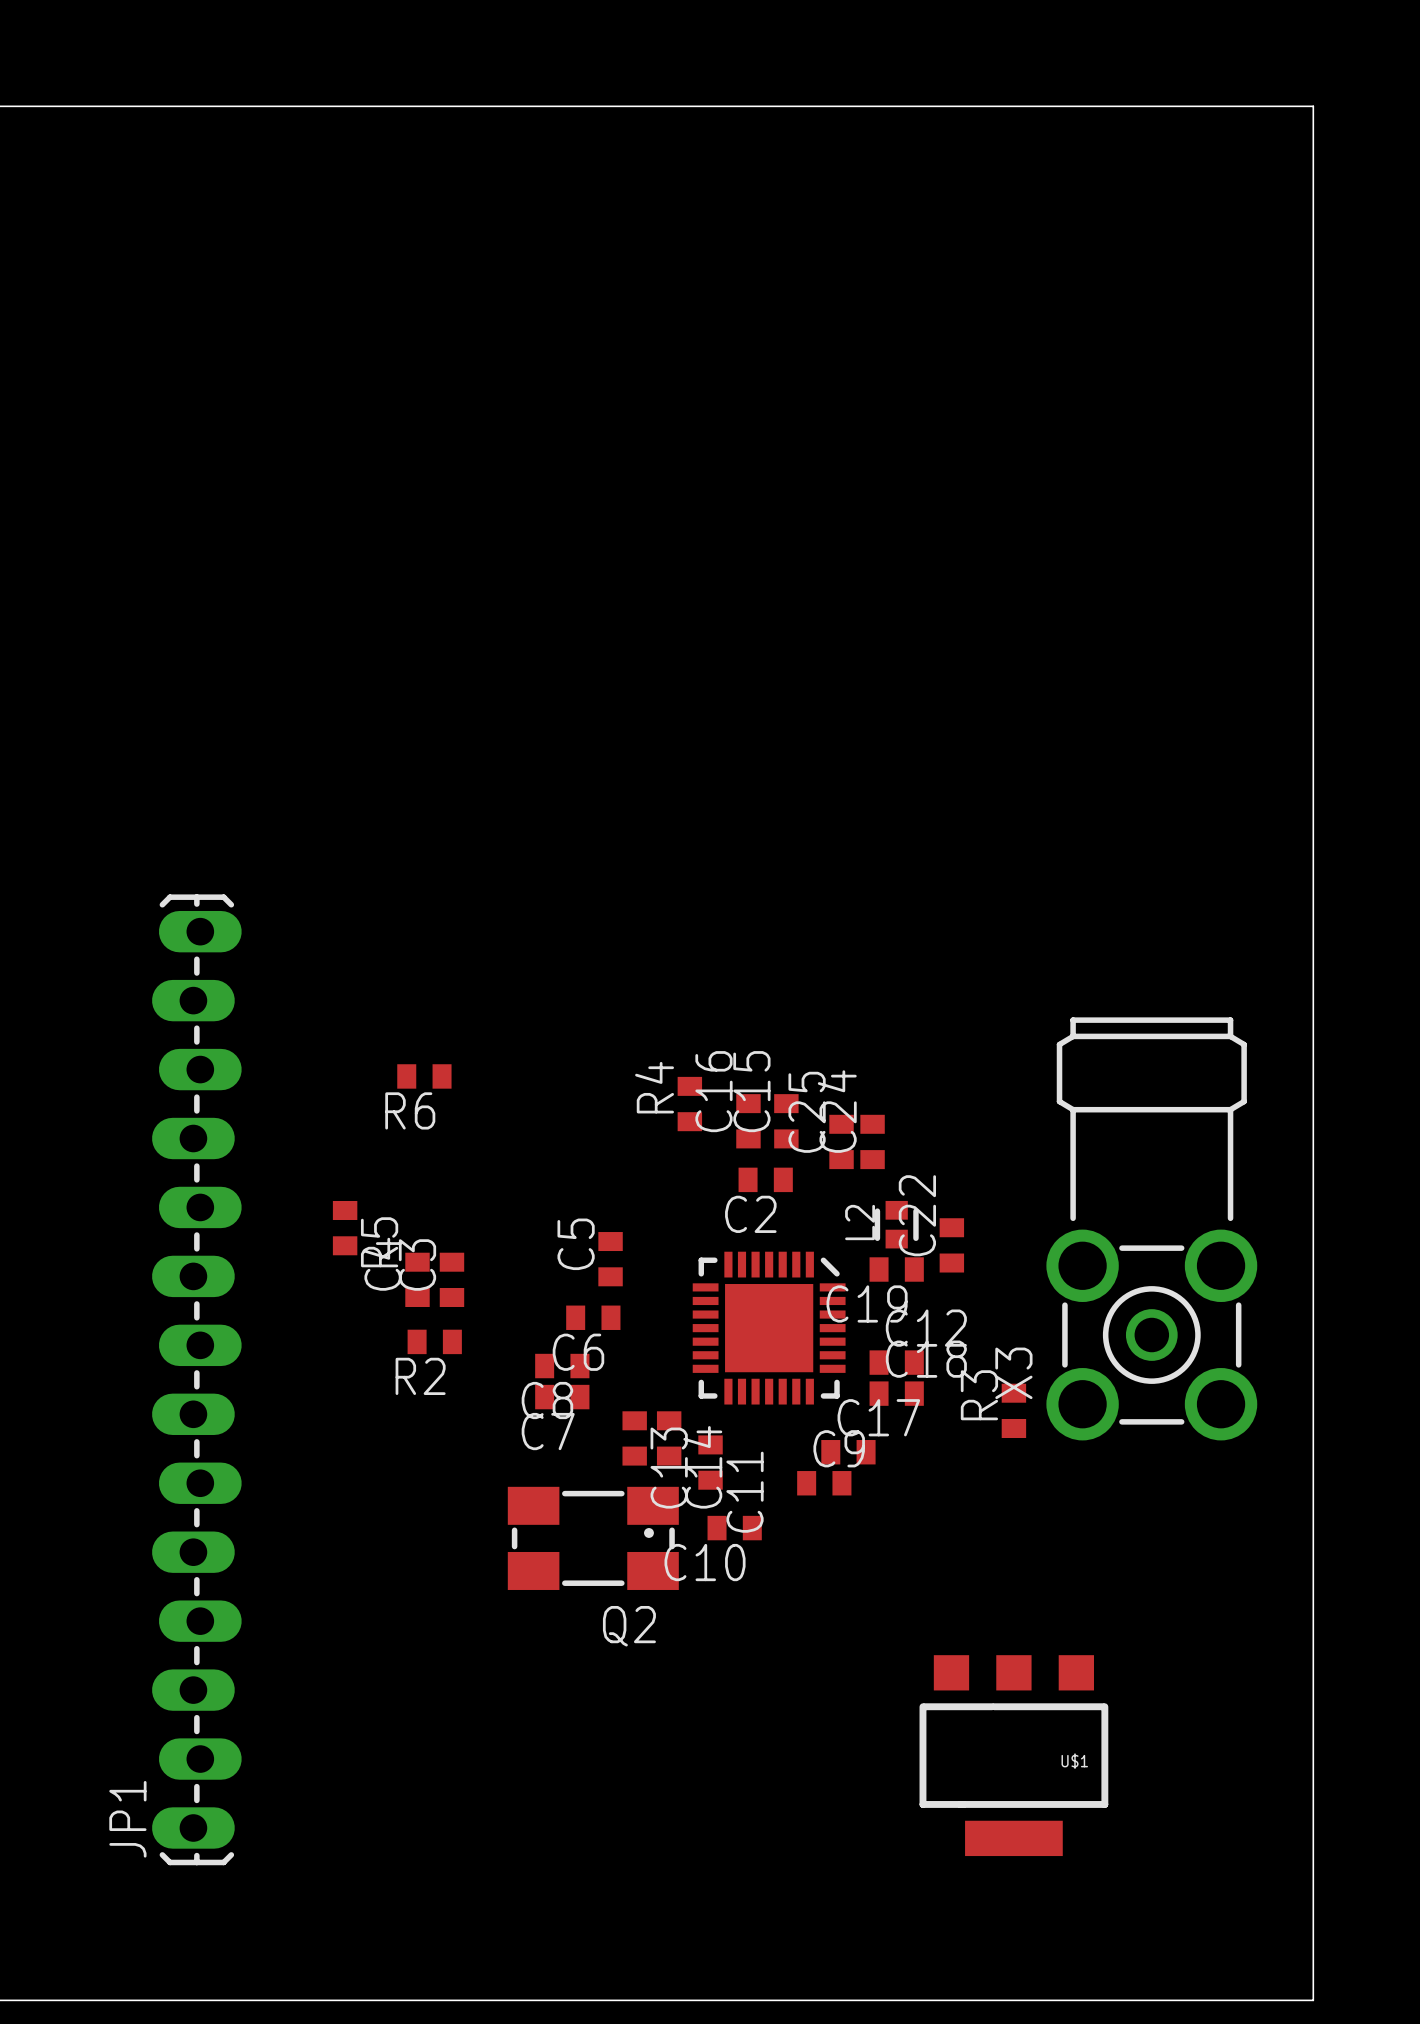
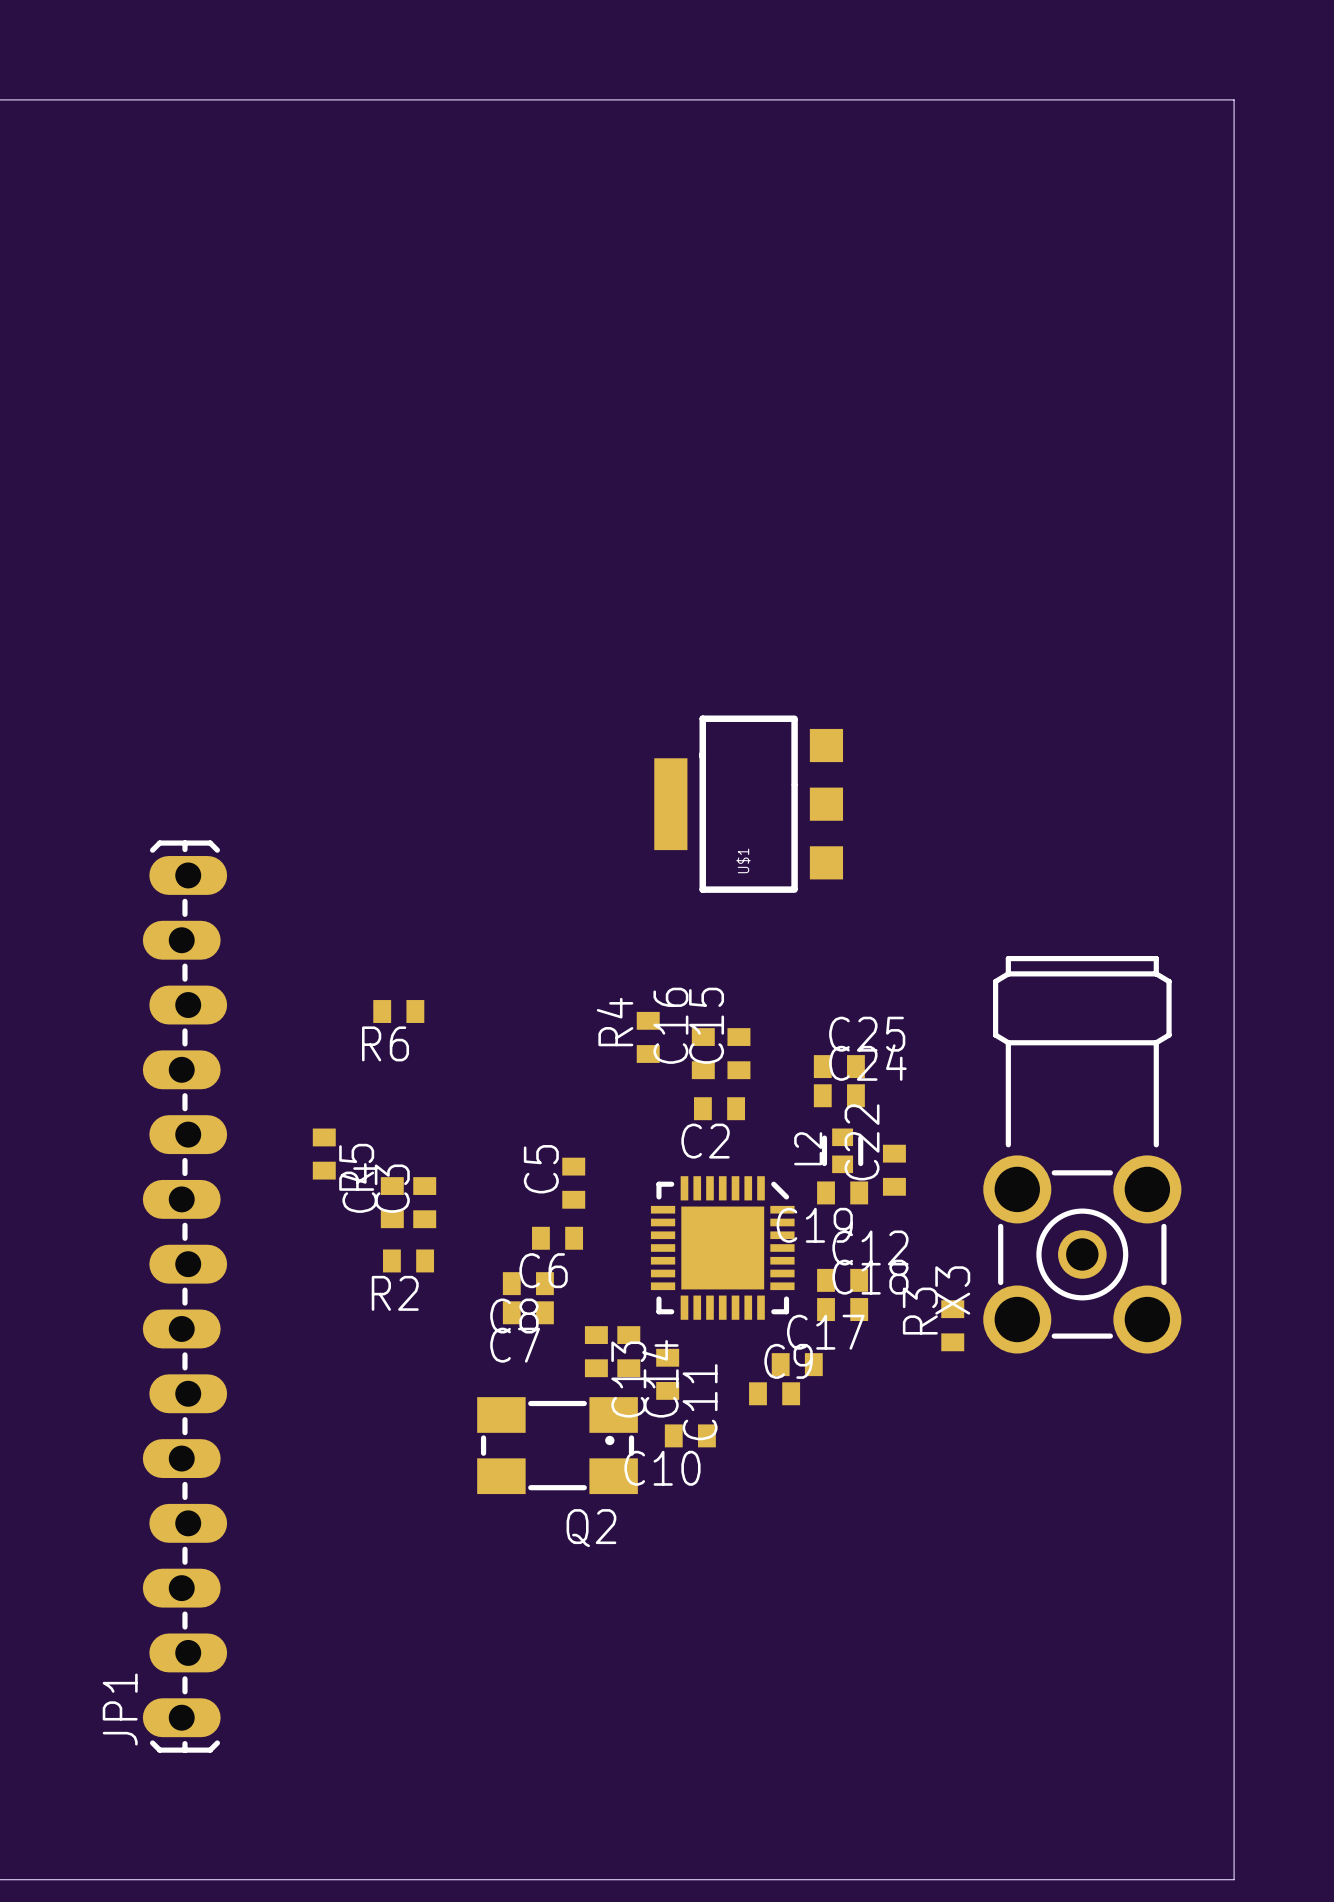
C25 rotation: 0° (841, 1141) -> 90° clockwise (839, 1066)
C25 position: (841, 1141) -> (839, 1066)
C24 rotation: 0° (872, 1141) -> 90° clockwise (839, 1095)
U$1 rotation: 0° (1013, 1755) -> 90° clockwise (748, 804)
U$1 position: (1013, 1755) -> (748, 804)

